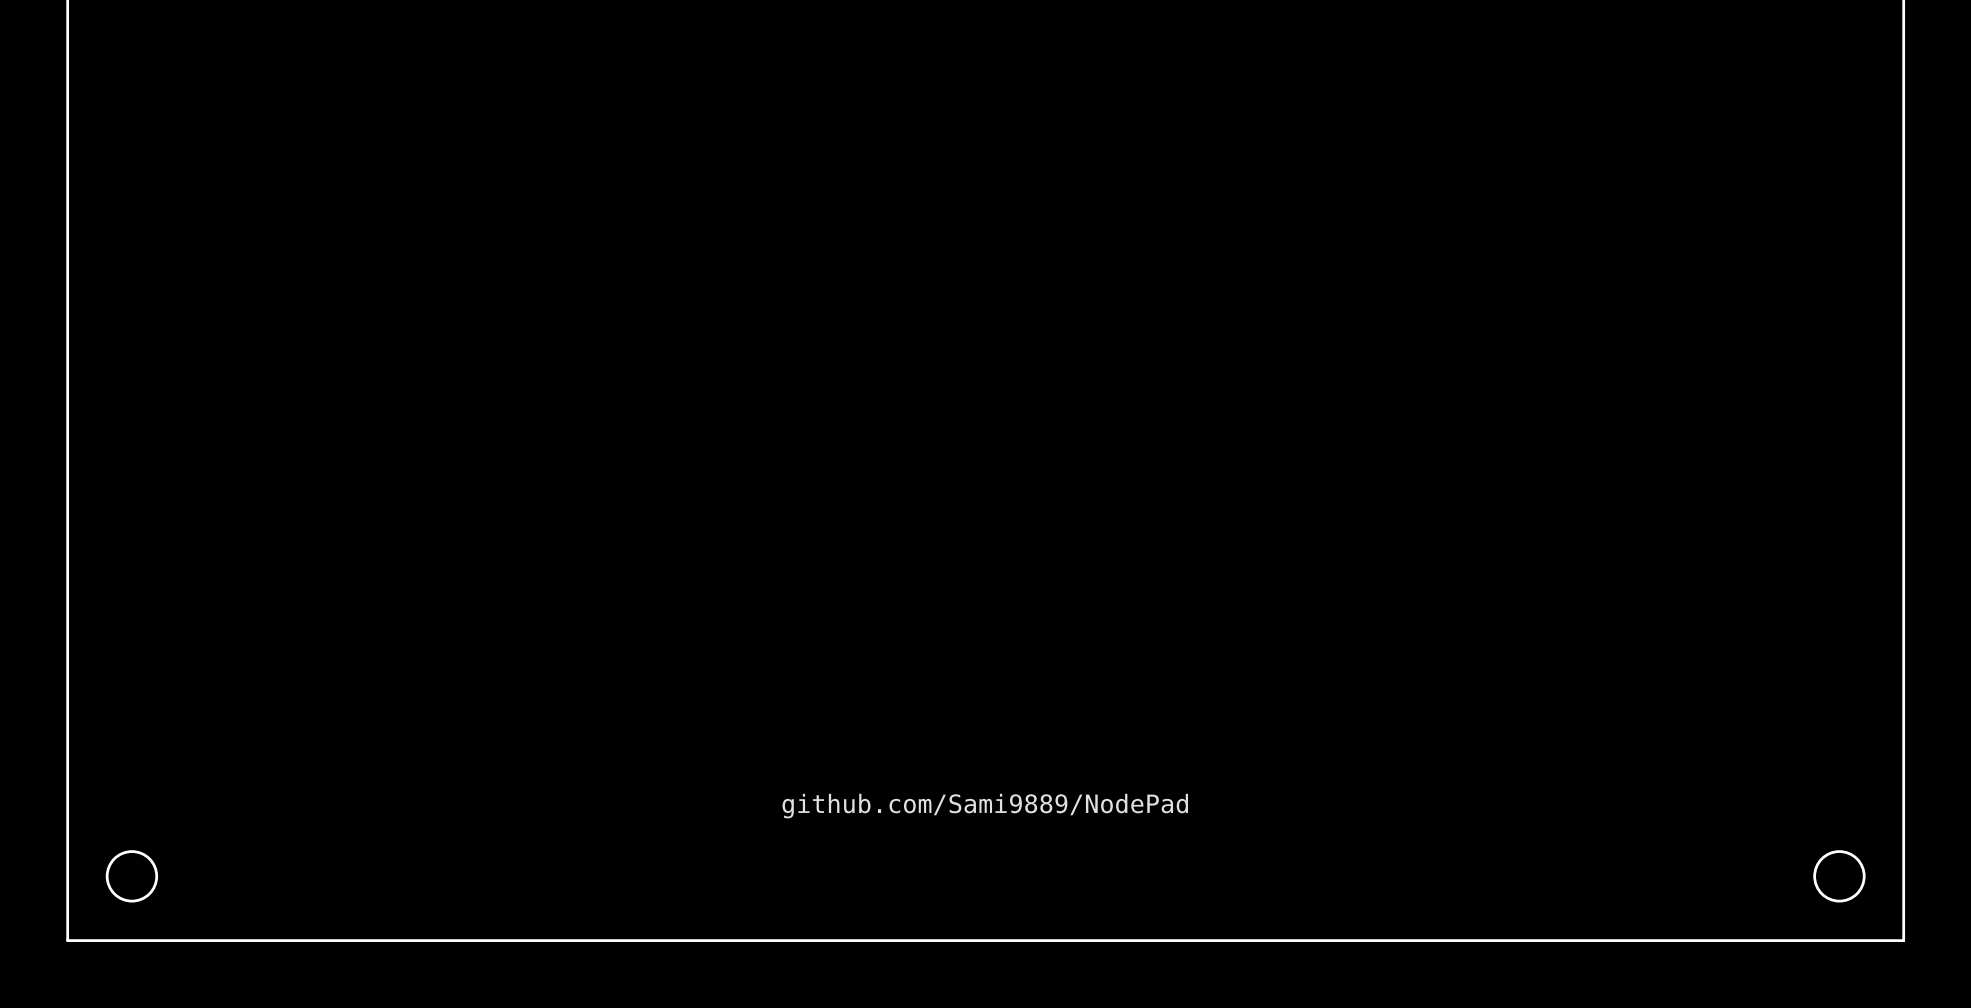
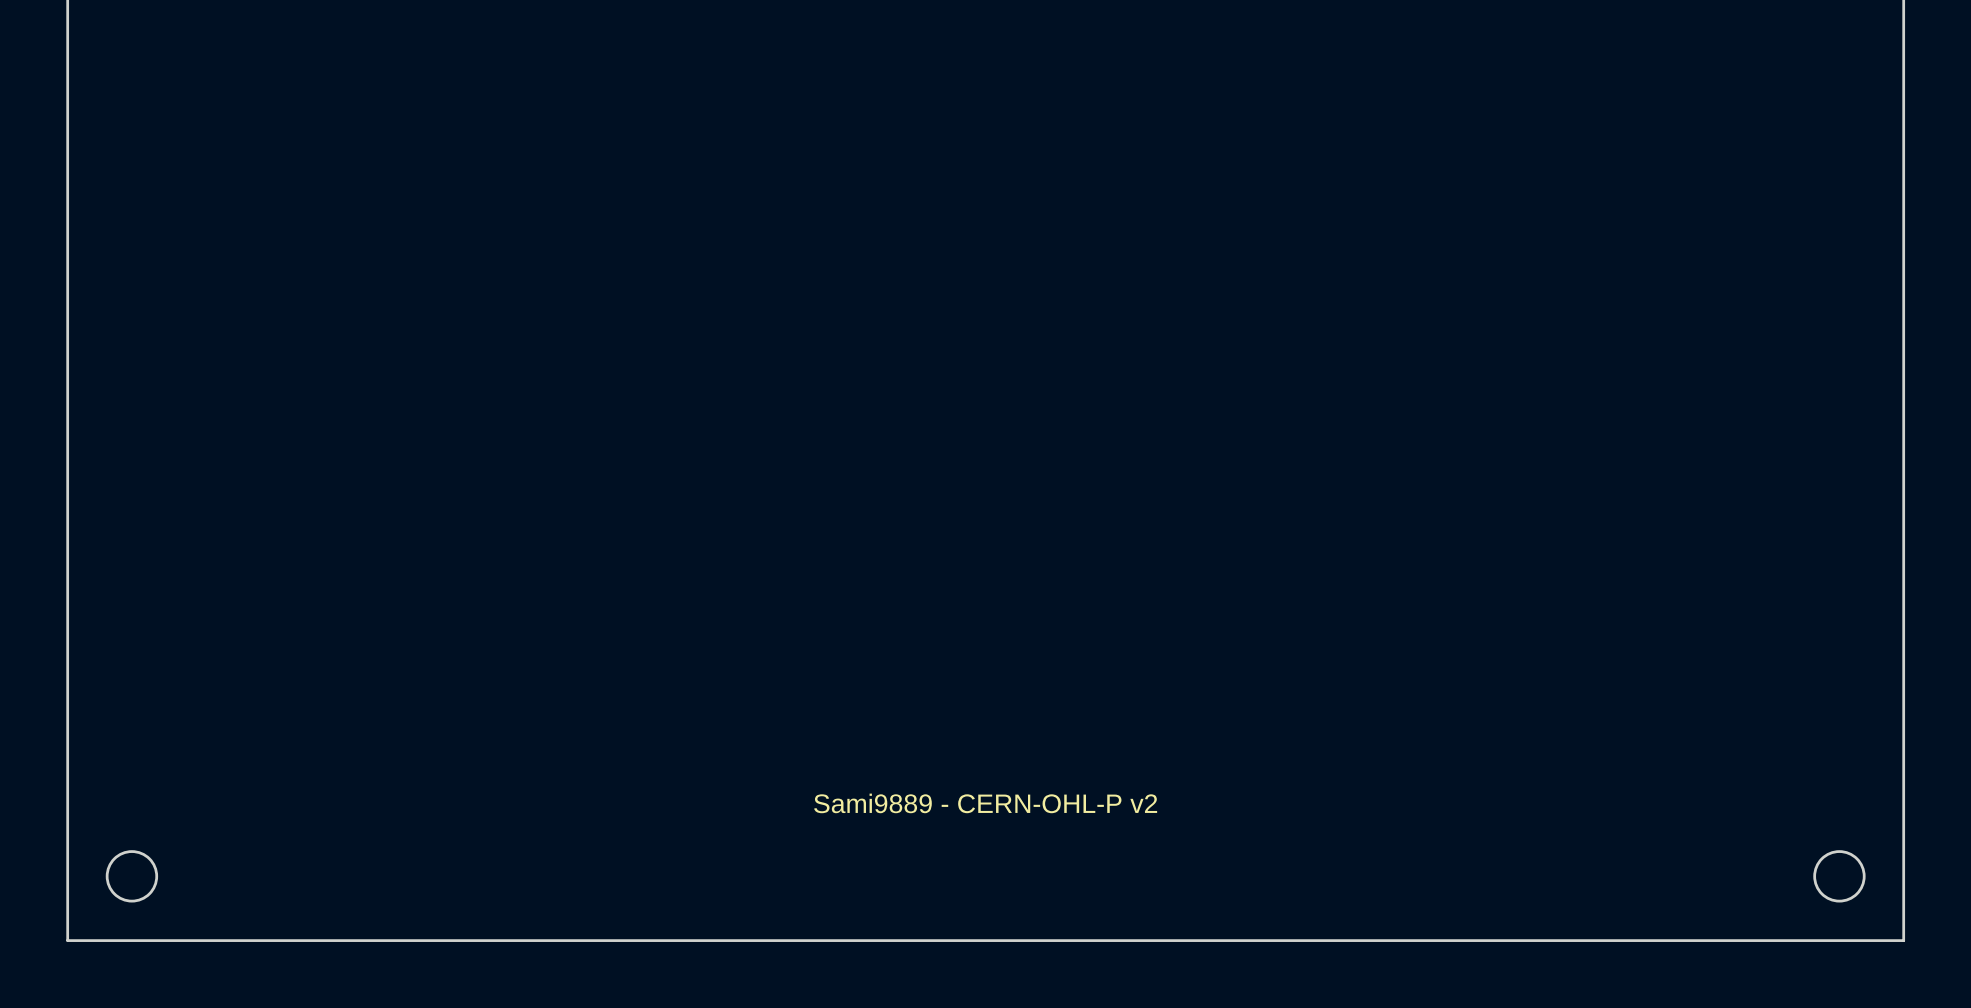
text: github.com/Sami9889/NodePad (985, 806) -> Sami9889 - CERN-OHL-P v2 (985, 803)

